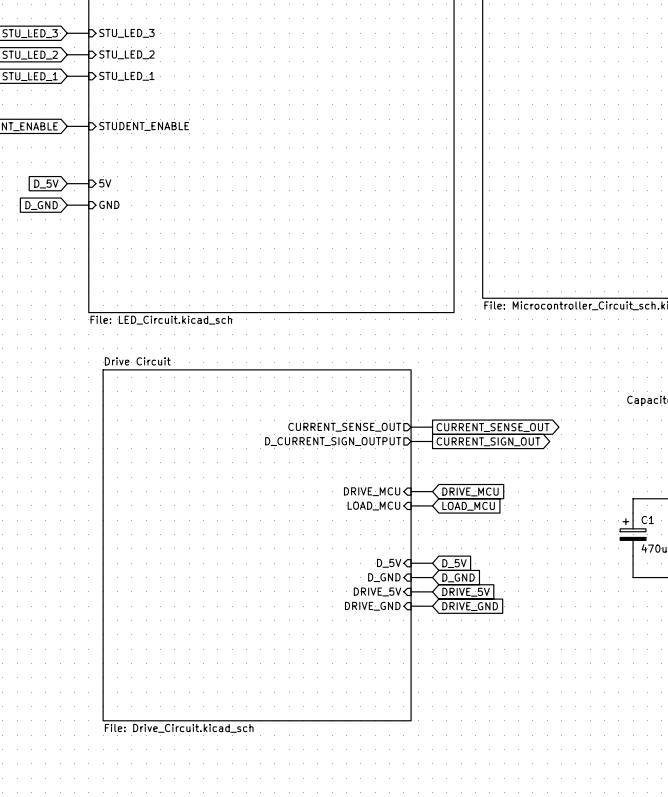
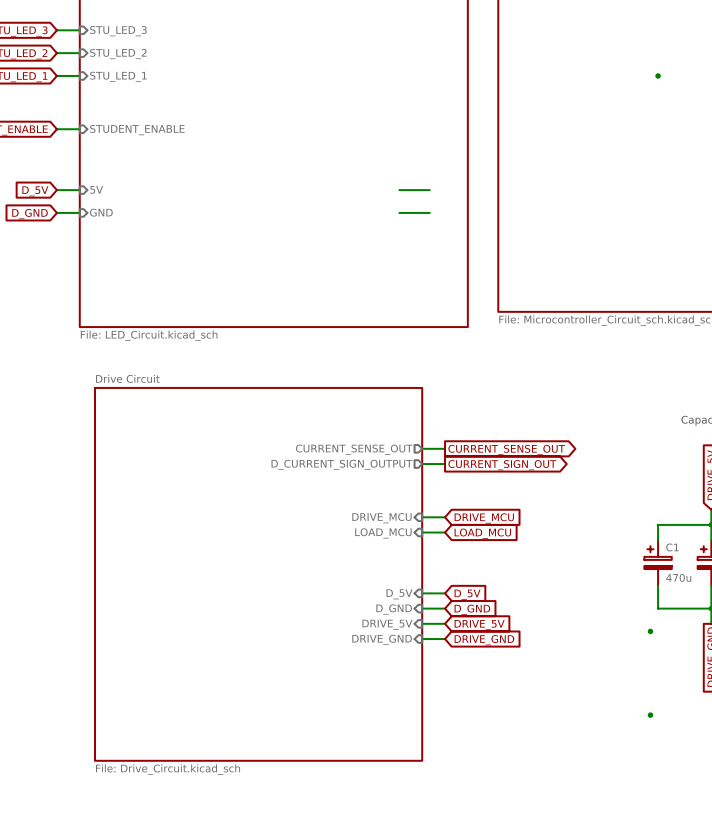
junction: none -> (658, 75)
wire: none -> (399, 190) (429, 190)
wire: none -> (399, 212) (429, 212)
junction: none -> (650, 631)
junction: none -> (650, 715)

